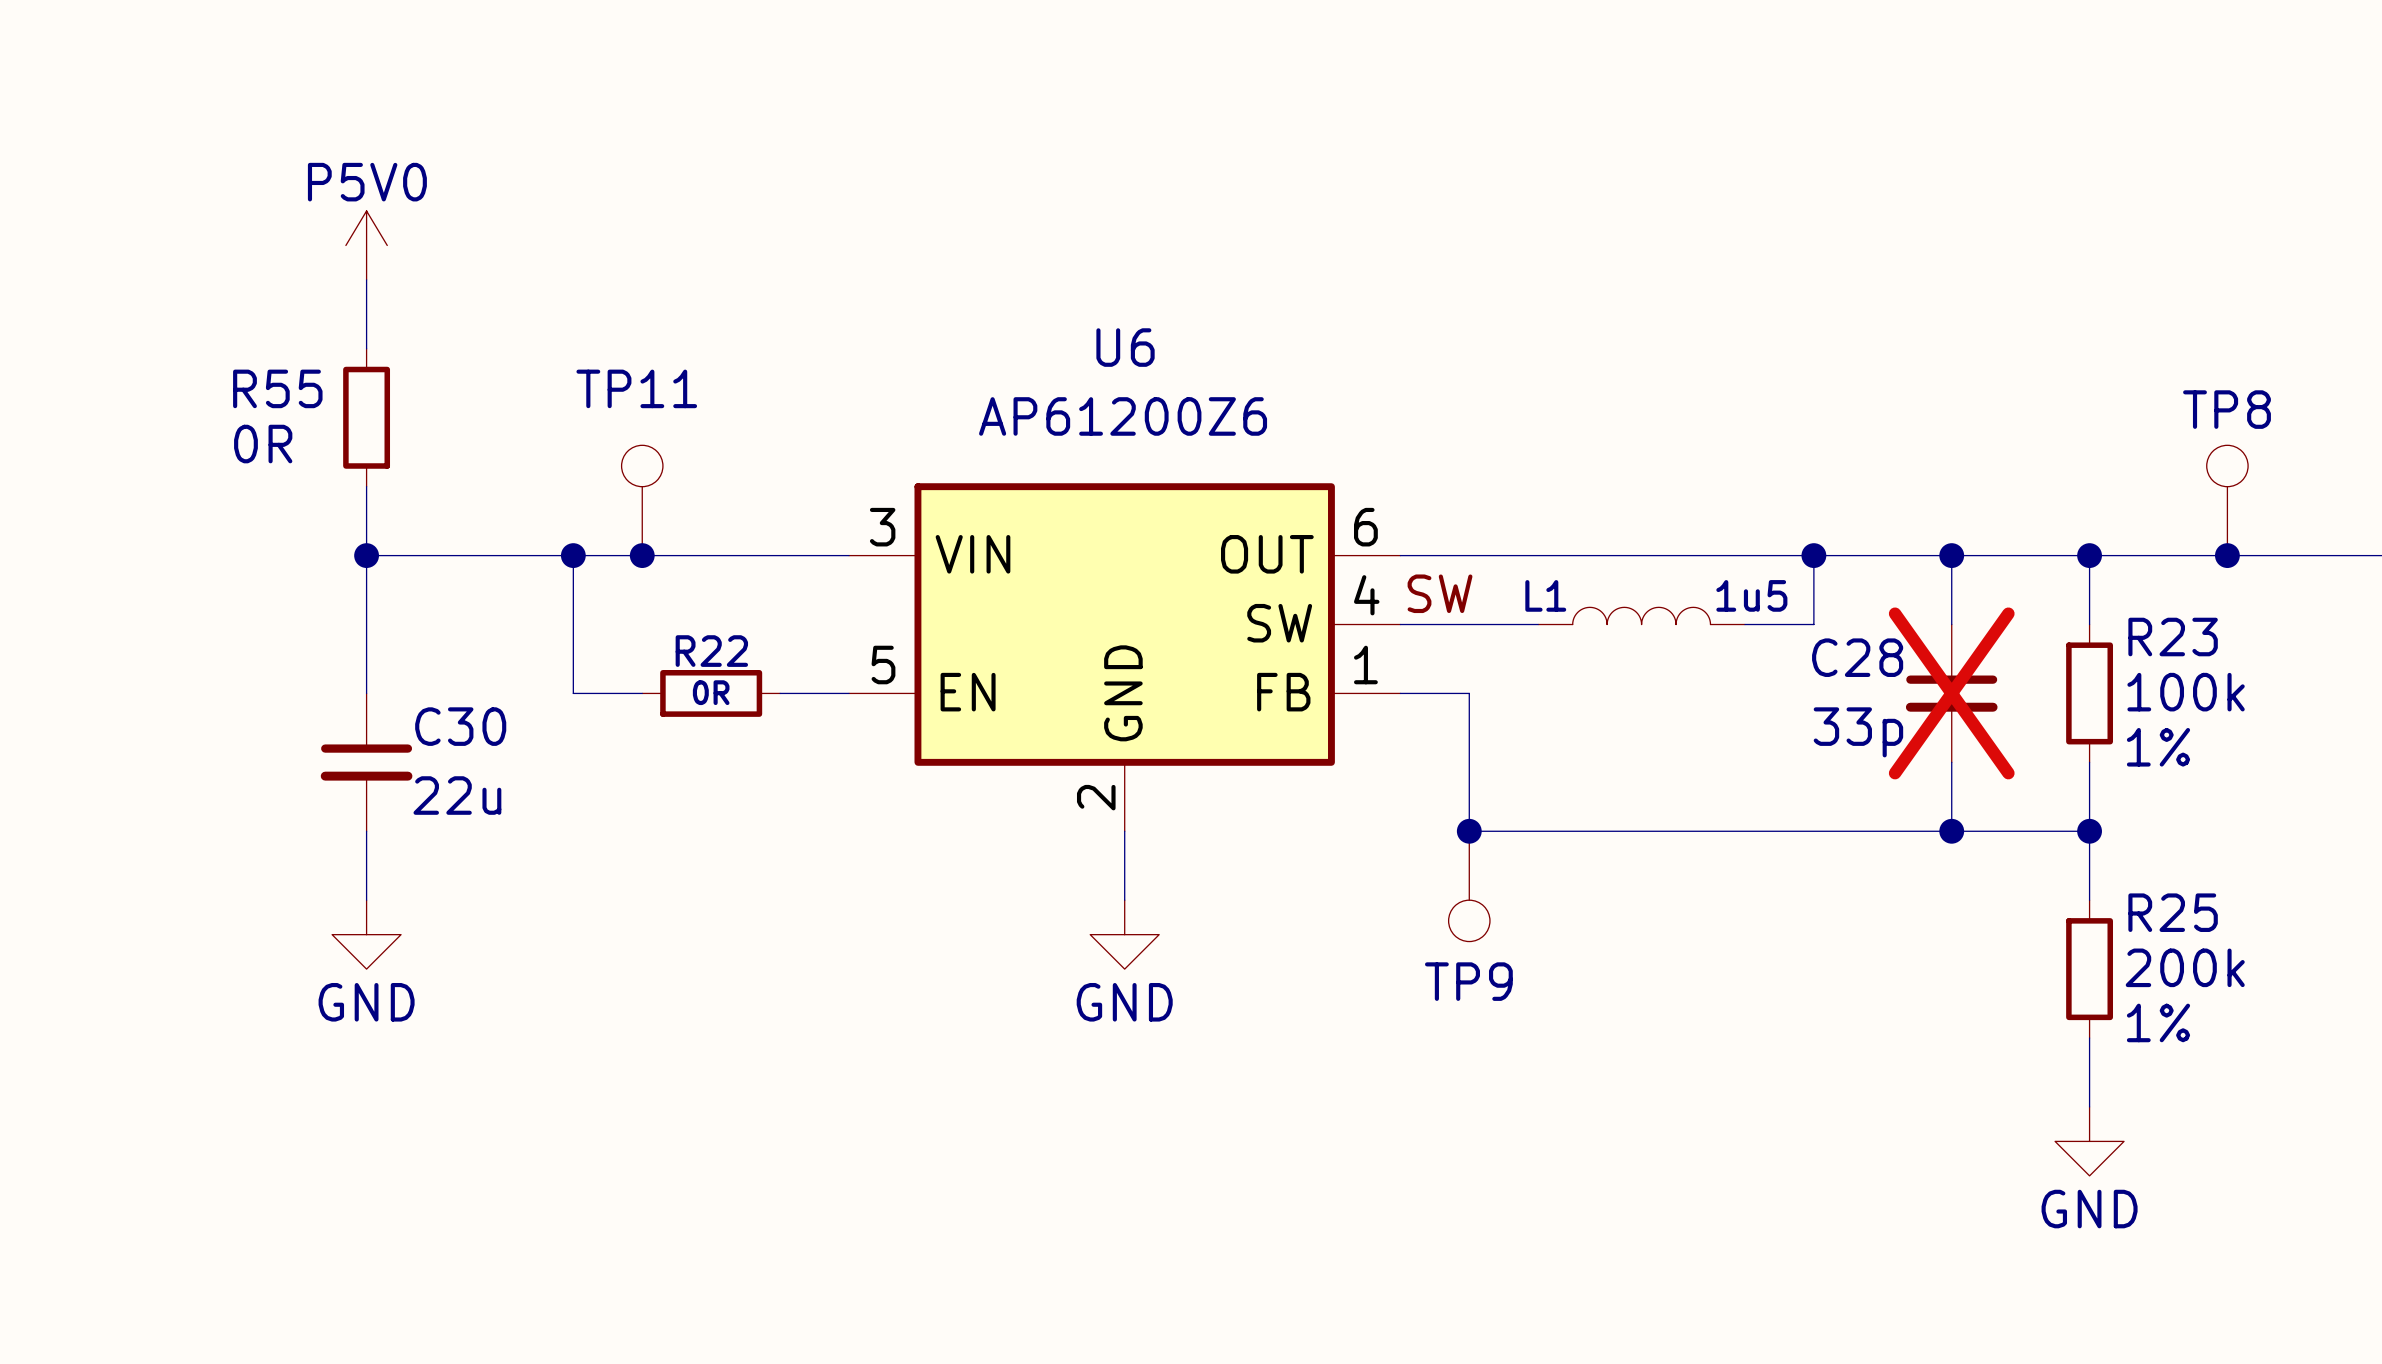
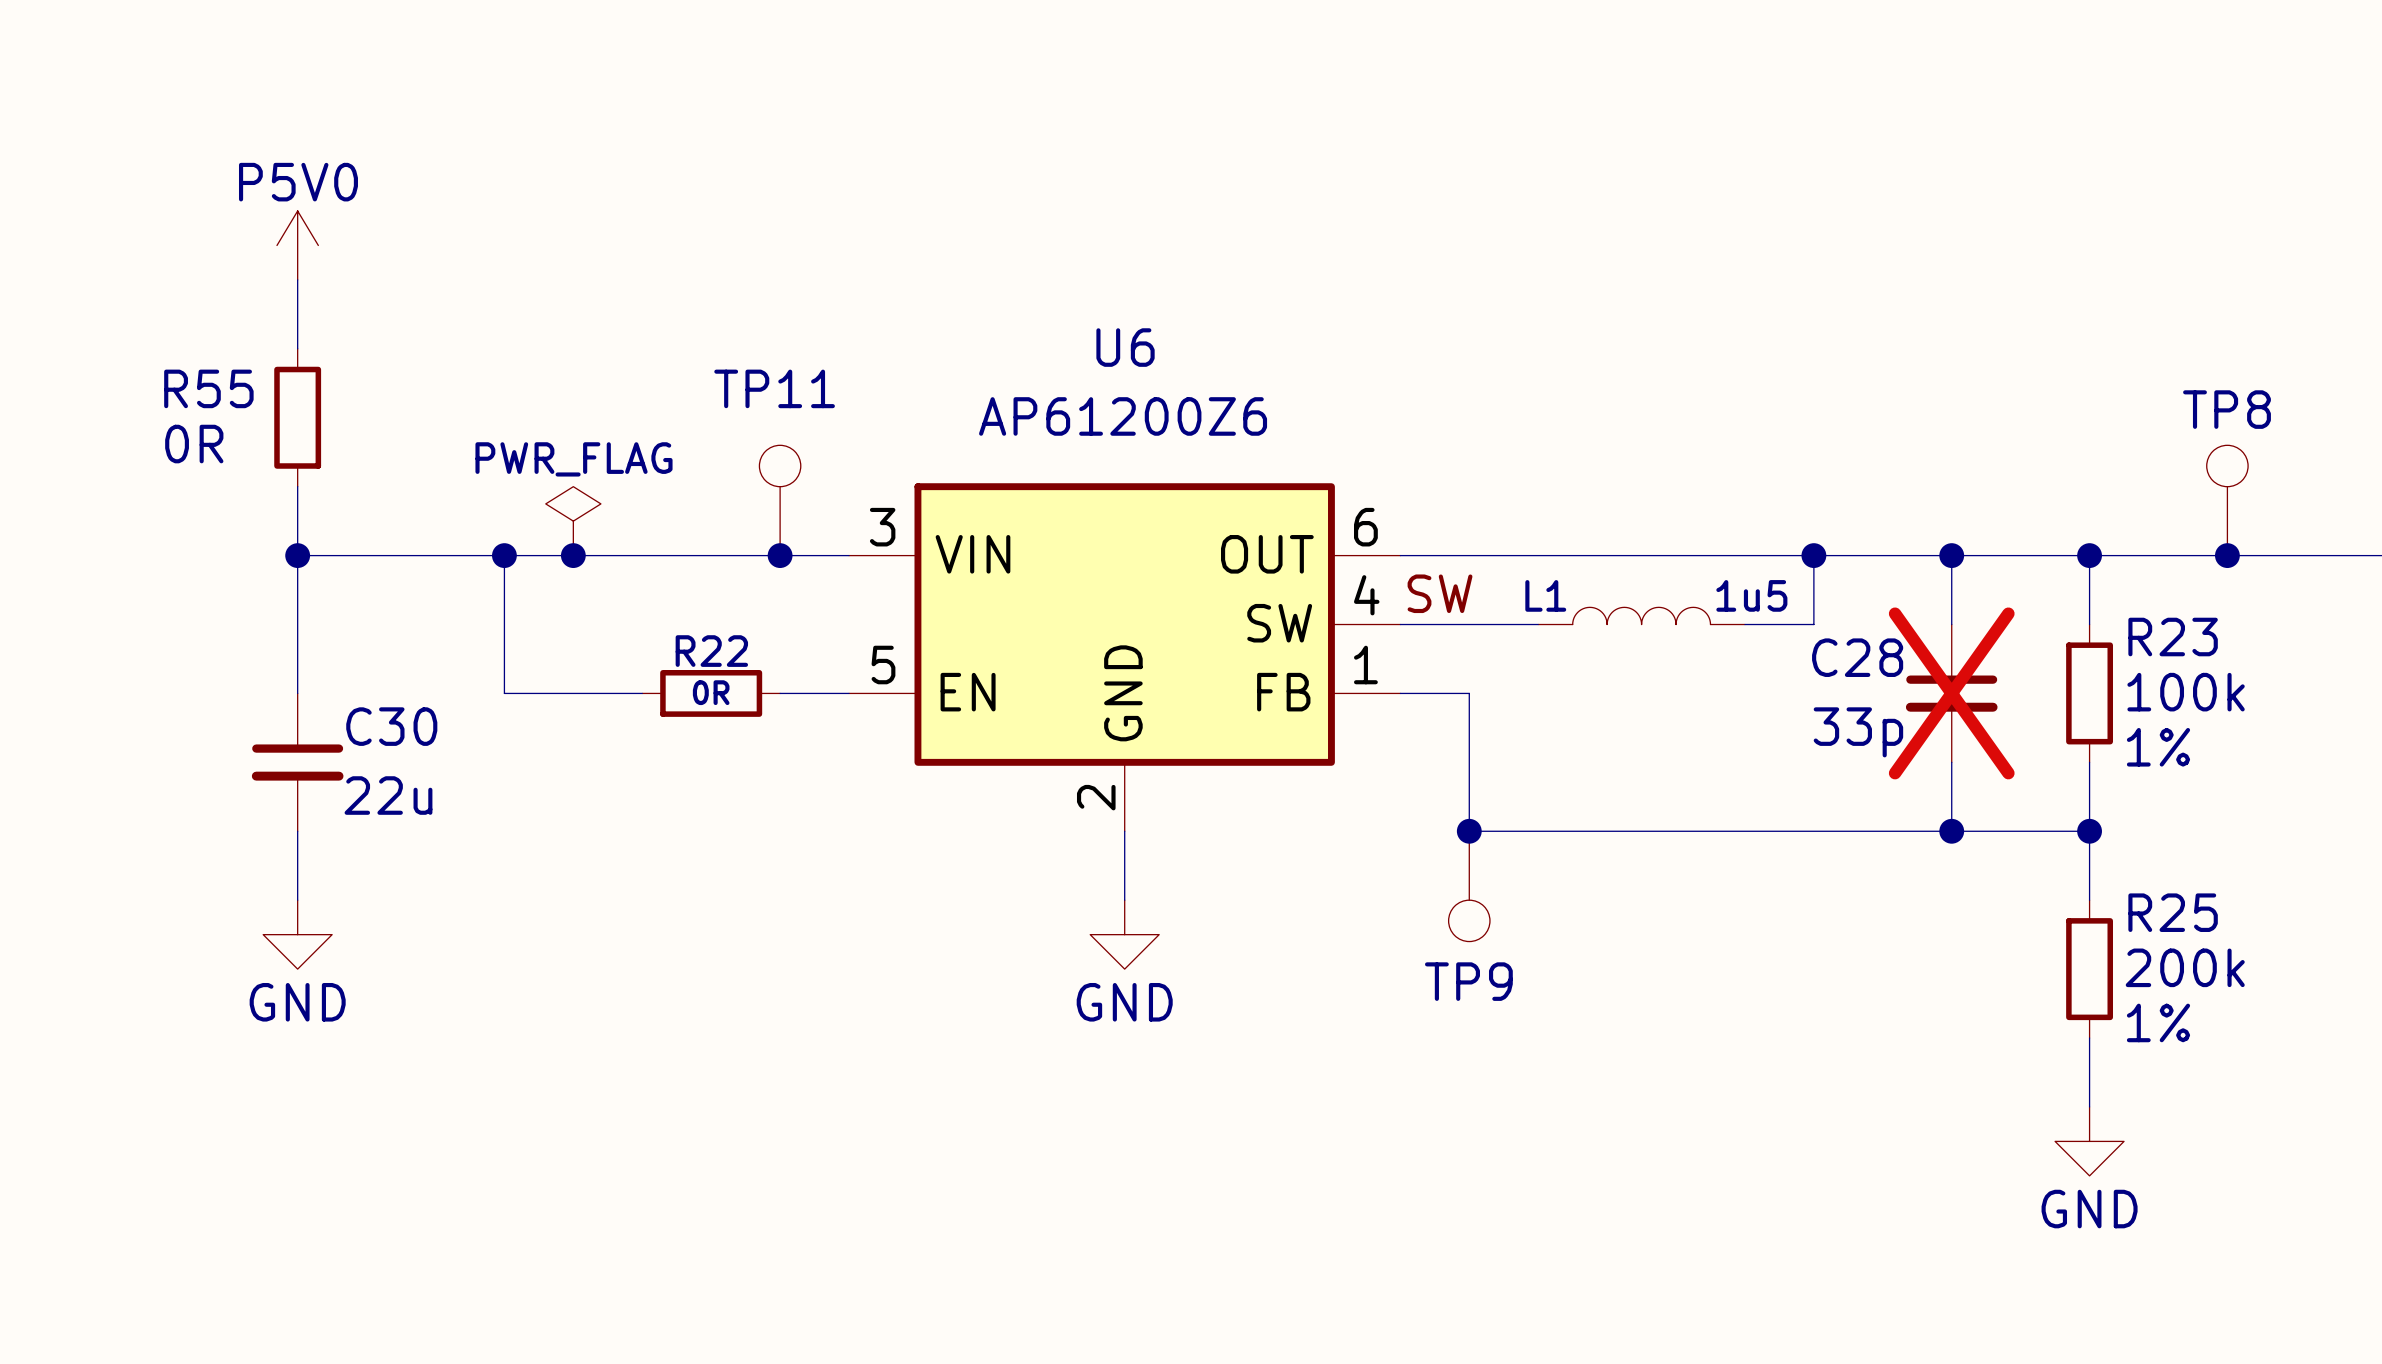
power symbol position: P5V0 (366, 245) -> P5V0 (297, 245)
wire: (366, 279) (366, 348) -> (297, 279) (297, 348)
R55 position: (366, 417) -> (297, 417)
wire: (366, 486) (366, 693) -> (297, 486) (297, 693)
TP11 position: (642, 500) -> (780, 500)
power symbol: none -> PWR_FLAG (573, 521)
wire: none -> (297, 555) (366, 555)
junction: none -> (297, 555)
junction: (366, 555) -> none
junction: none -> (504, 555)
wire: (573, 555) (573, 693) -> (504, 555) (504, 693) (573, 693)
junction: (642, 555) -> none
junction: none -> (780, 555)
C30 position: (366, 762) -> (297, 762)
wire: (366, 831) (366, 900) -> (297, 831) (297, 900)
power symbol position: GND (366, 934) -> GND (297, 934)

